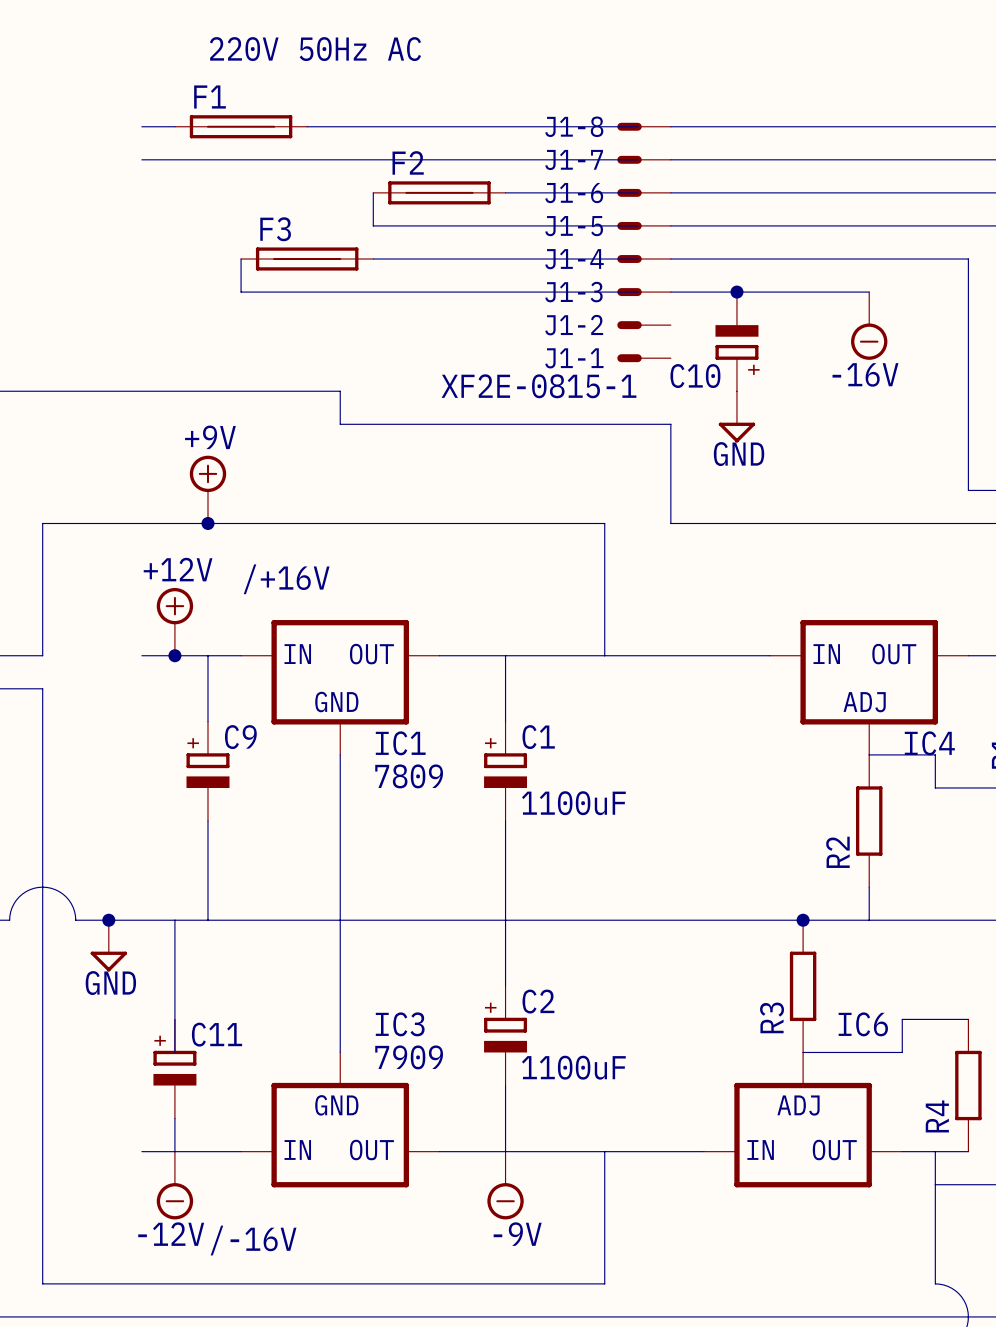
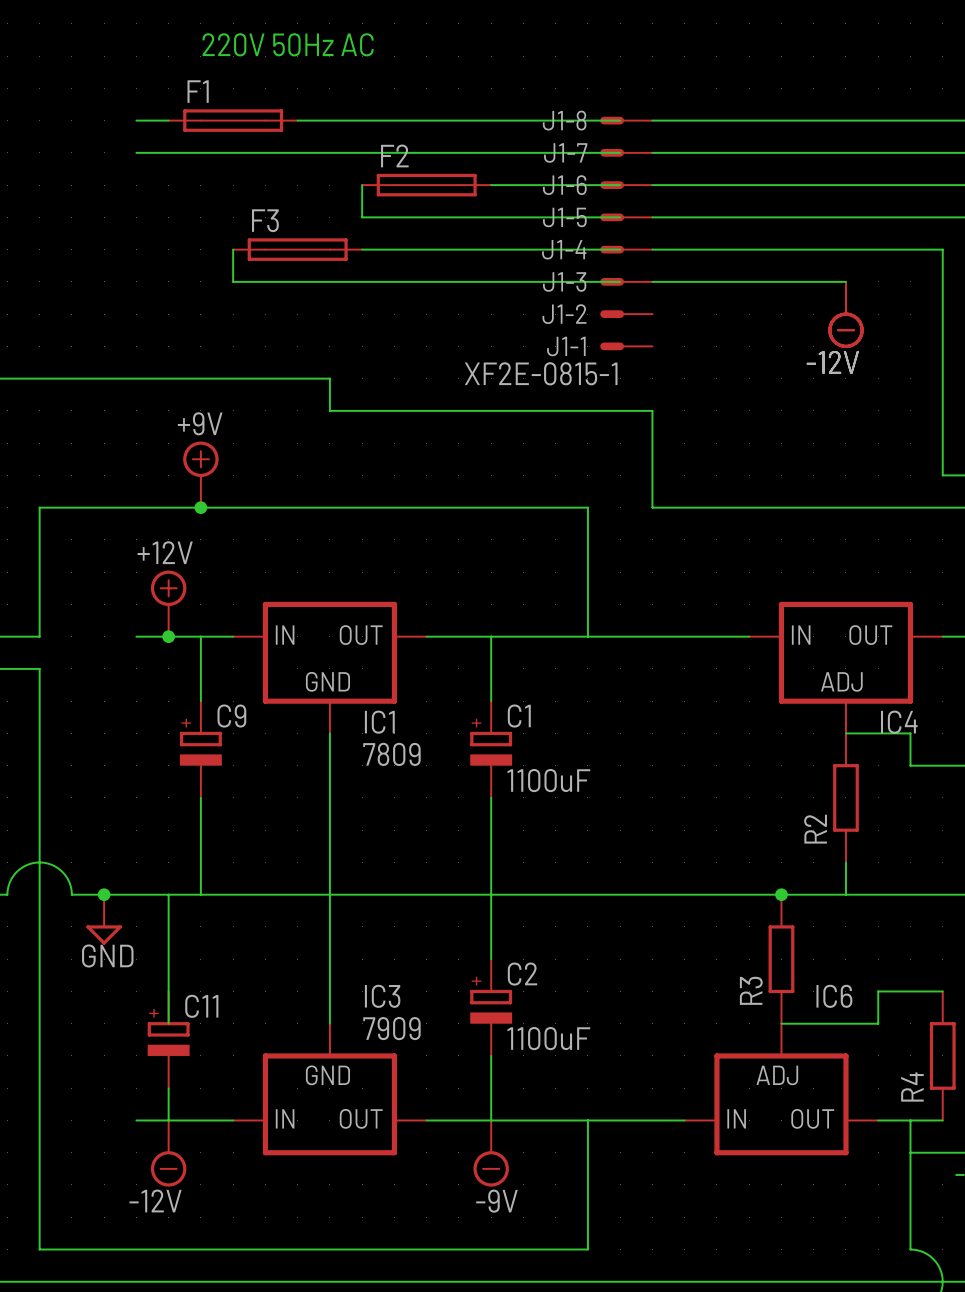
junction: (736, 292) -> none
power symbol: -16V (869, 325) -> -12V (845, 314)
C10: (736, 341) -> none
power symbol: GND (736, 416) -> none
text: /+16V (286, 579) -> none
text: /-16V (253, 1240) -> none

